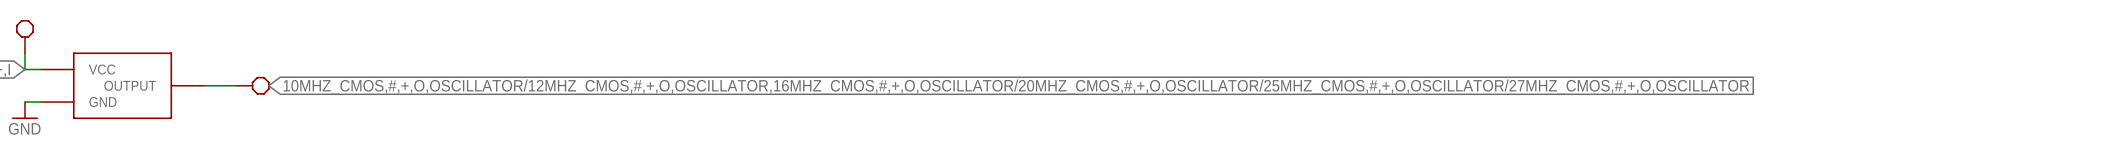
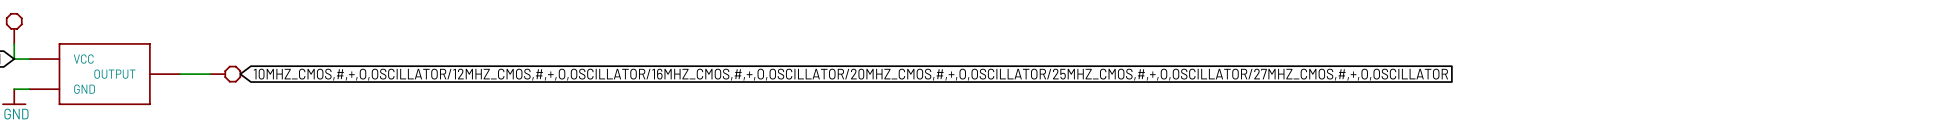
global label: 10MHZ_CMOS,#,+,O,OSCILLATOR/12MHZ_CMOS,#,+,O,OSCILLATOR,16MHZ_CMOS,#,+,O,OSCILLATOR/20MHZ_CMOS,#,+,O,OSCILLATOR/25MHZ_CMOS,#,+,O,OSCILLATOR/27MHZ_CMOS,#,+,O,OSCILLATOR (1016, 87) -> 10MHZ_CMOS,#,+,O,OSCILLATOR/12MHZ_CMOS,#,+,O,OSCILLATOR/16MHZ_CMOS,#,+,O,OSCILLATOR/20MHZ_CMOS,#,+,O,OSCILLATOR/25MHZ_CMOS,#,+,O,OSCILLATOR/27MHZ_CMOS,#,+,O,OSCILLATOR (850, 74)

